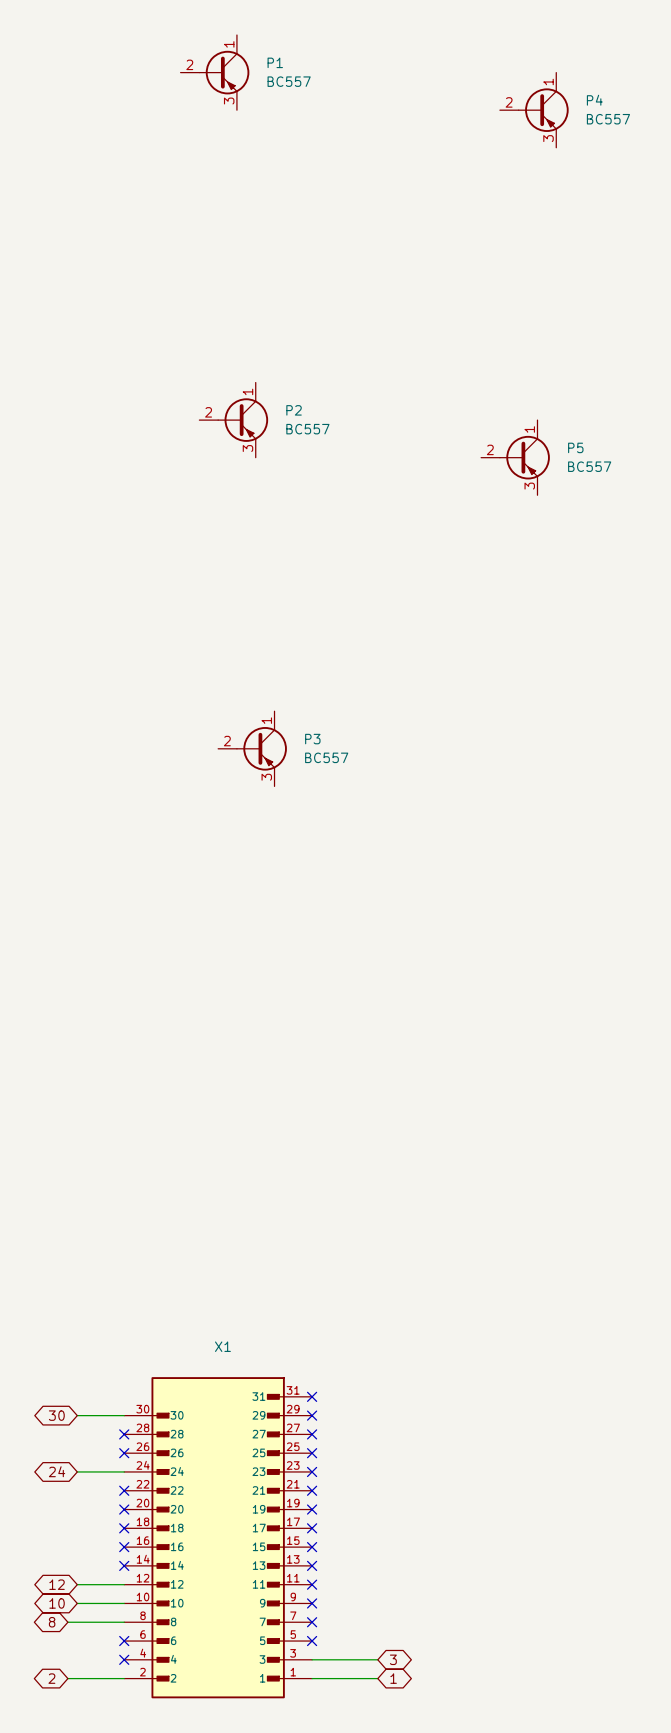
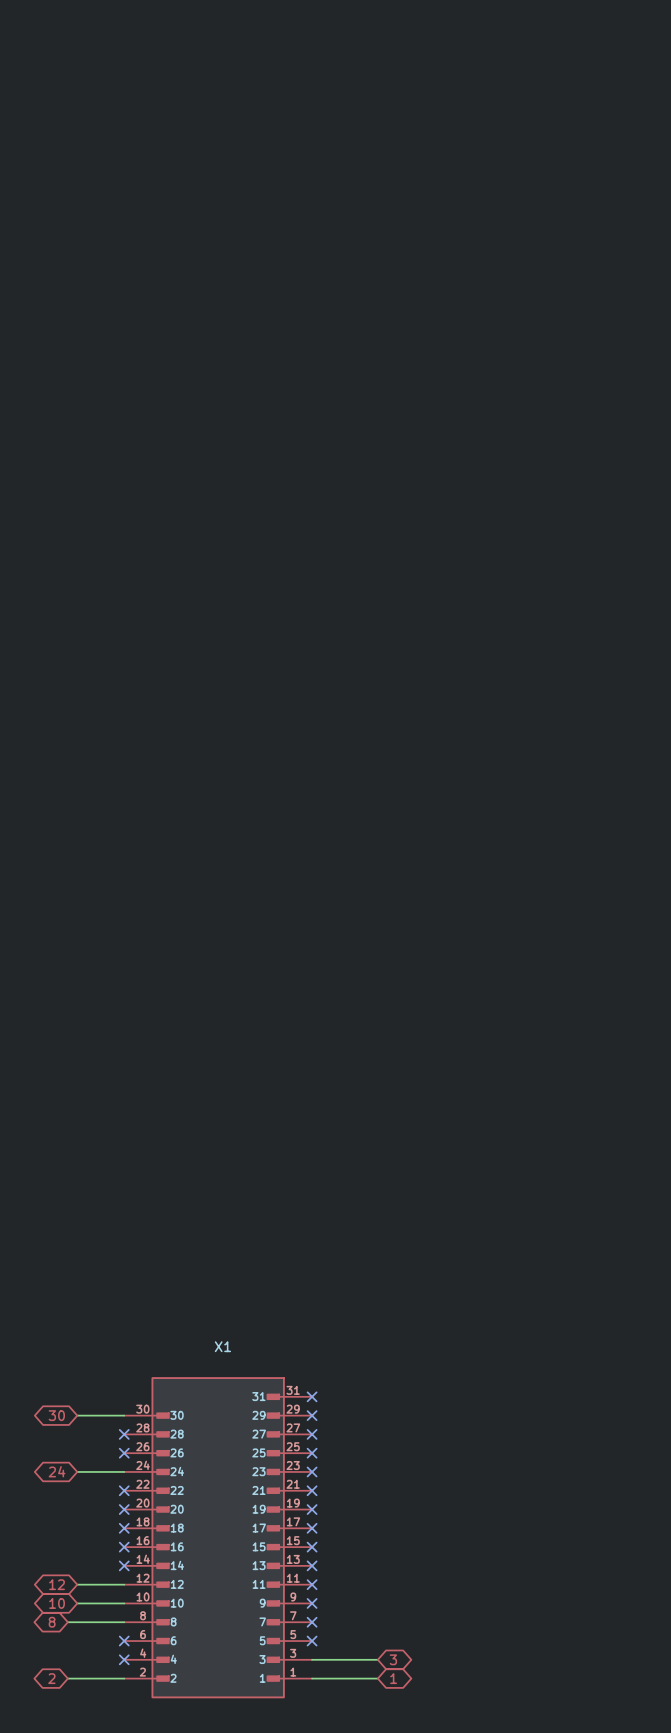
P1: BC557 (214, 72) -> none
P4: BC557 (534, 110) -> none
P2: BC557 (233, 420) -> none
P5: BC557 (515, 457) -> none
P3: BC557 (252, 748) -> none

